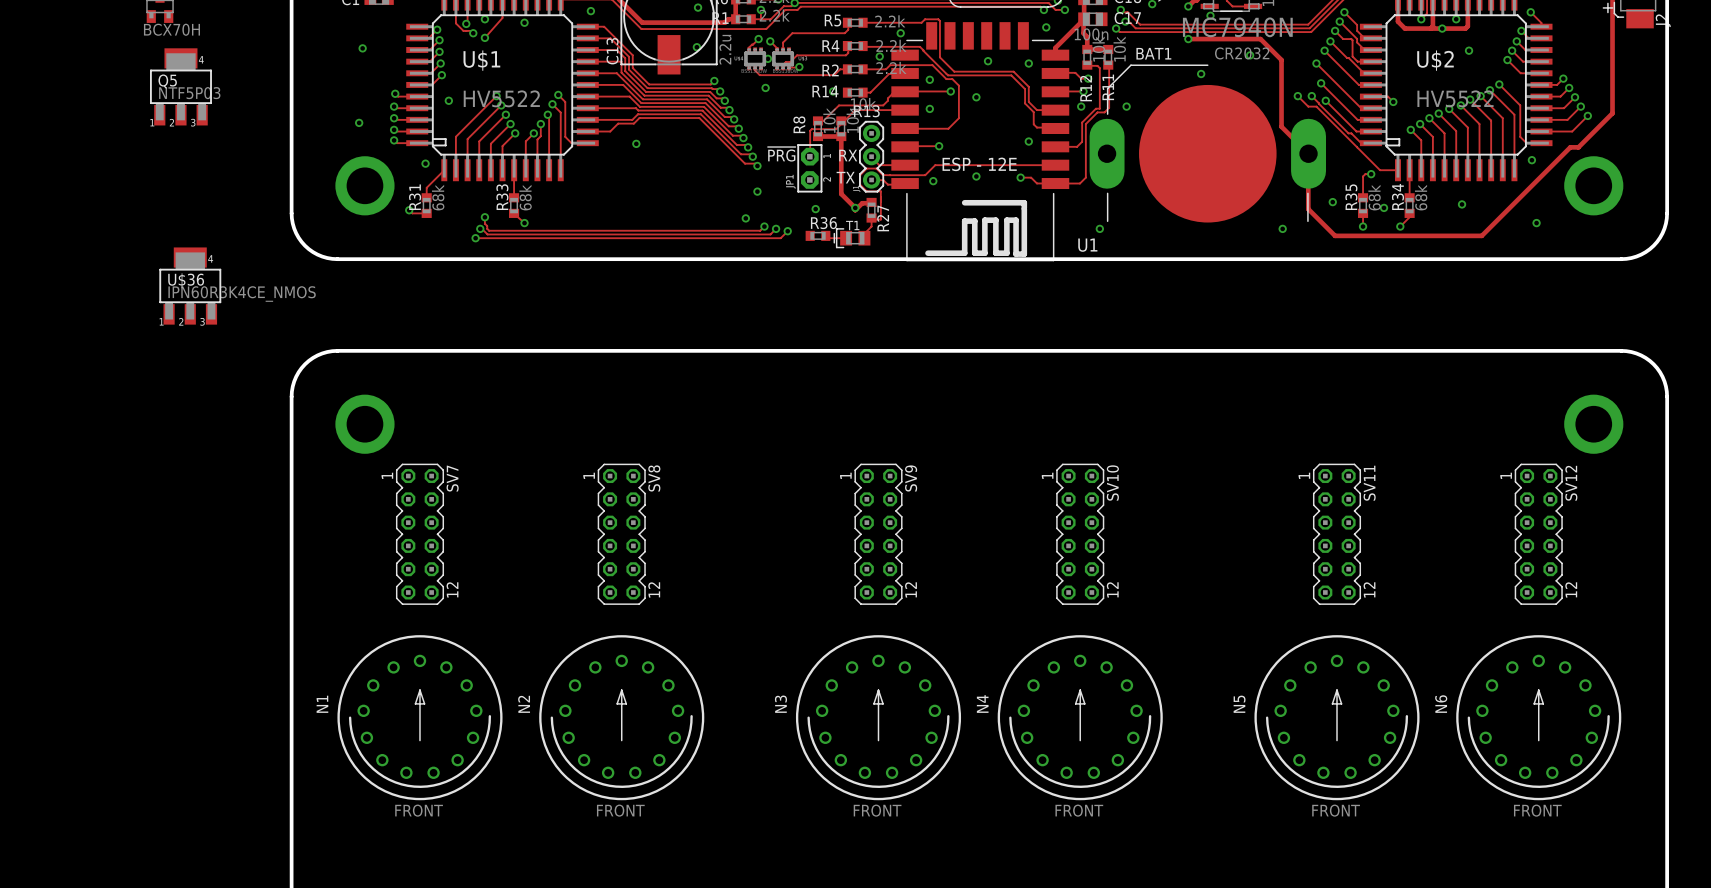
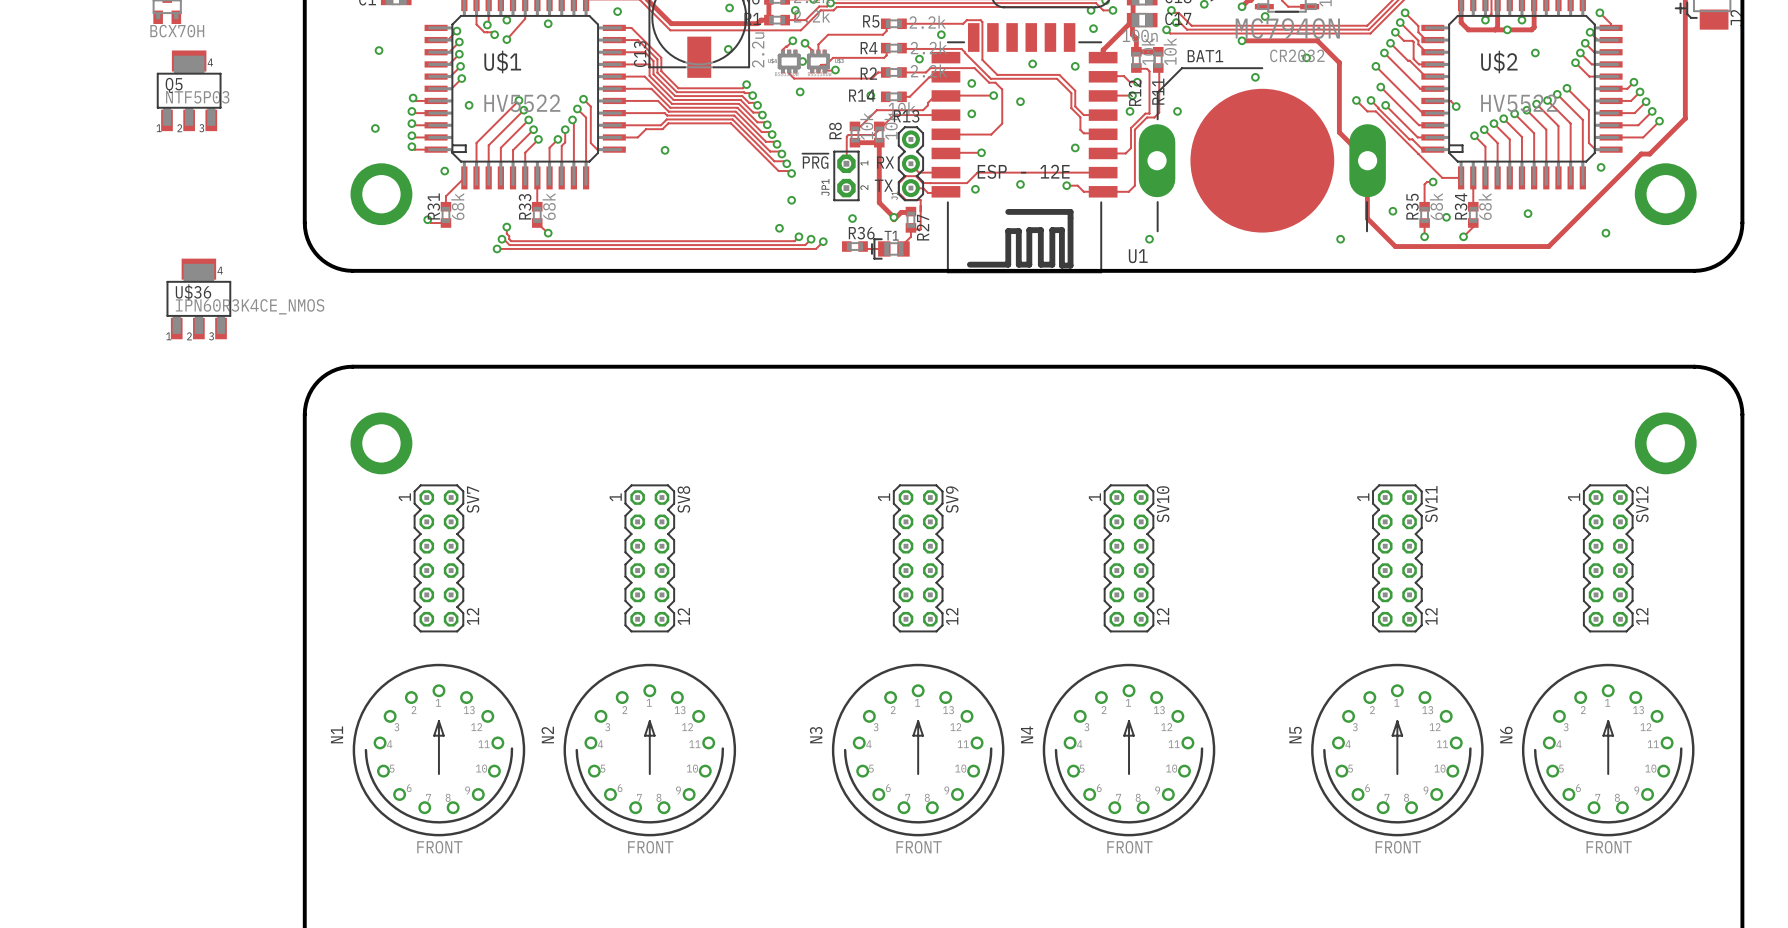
N1 footprint: [337, 635, 503, 801] -> [352, 663, 526, 837]
N2 footprint: [539, 635, 705, 801] -> [563, 663, 737, 837]
N3 footprint: [795, 635, 962, 801] -> [831, 663, 1005, 837]
N4 footprint: [997, 635, 1163, 801] -> [1042, 663, 1216, 837]
N5 footprint: [1254, 635, 1420, 801] -> [1311, 663, 1484, 837]
N6 footprint: [1456, 635, 1622, 801] -> [1521, 663, 1695, 837]

